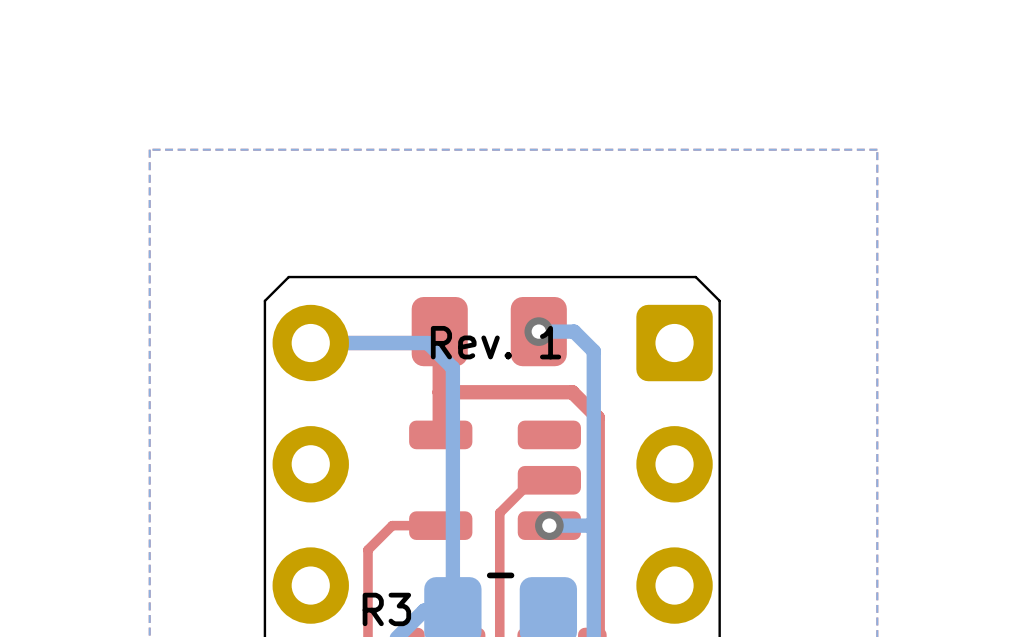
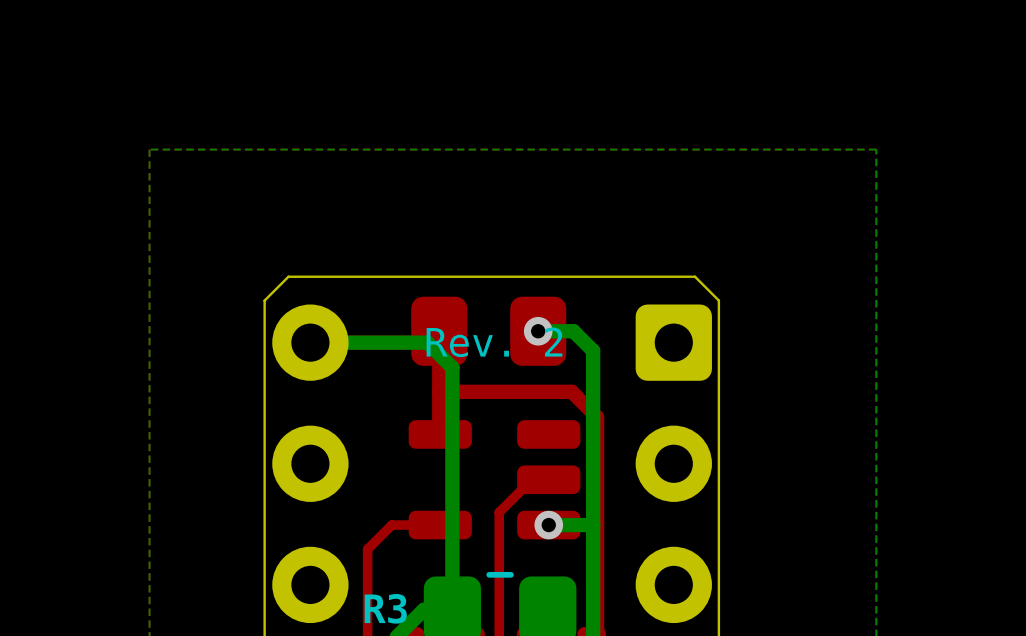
text: Rev. 1 (496, 342) -> Rev. 2 (494, 342)

